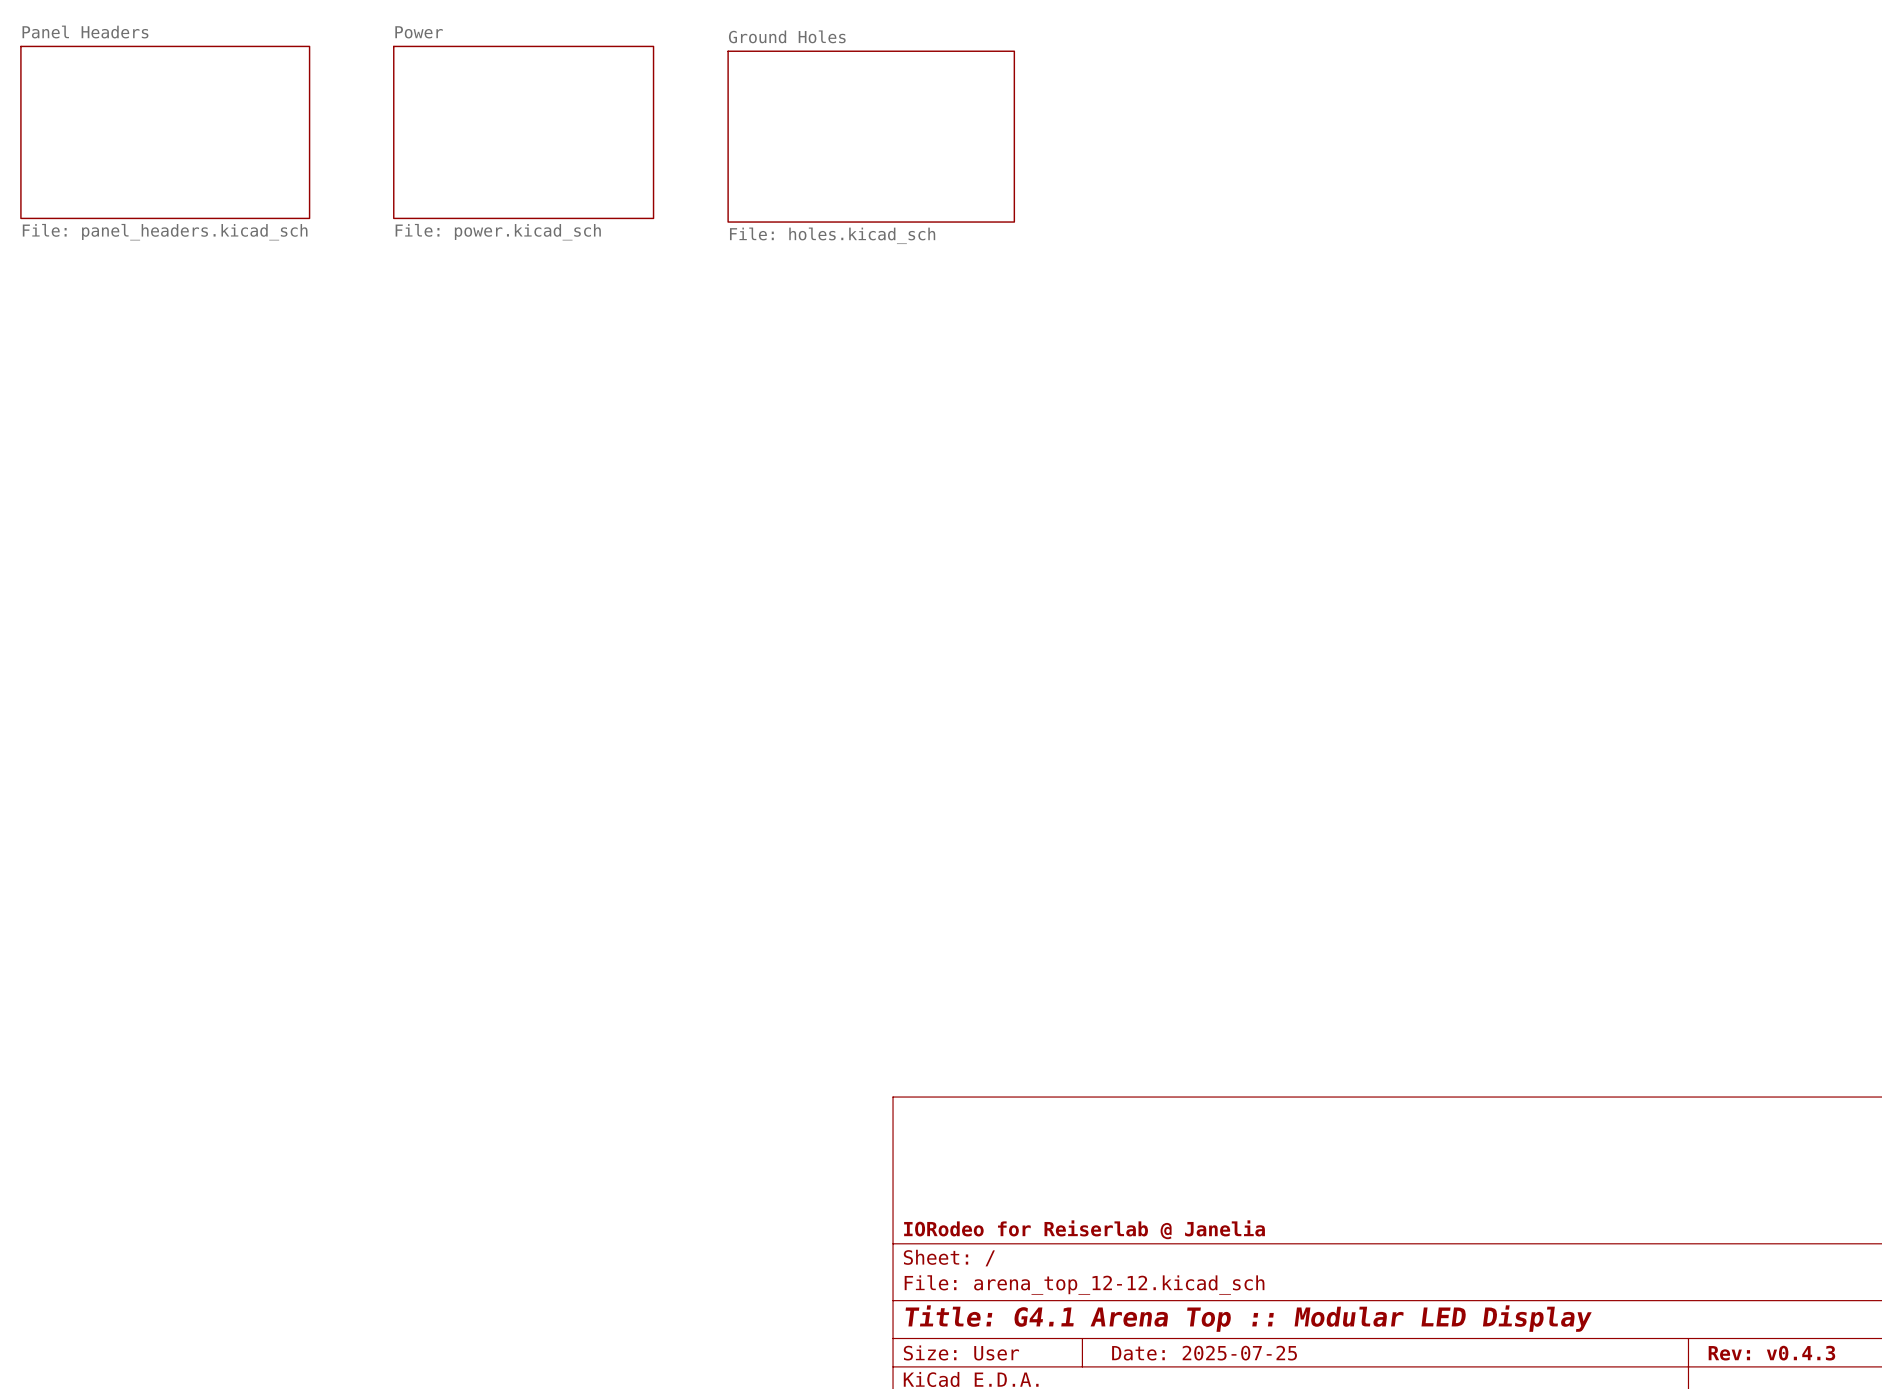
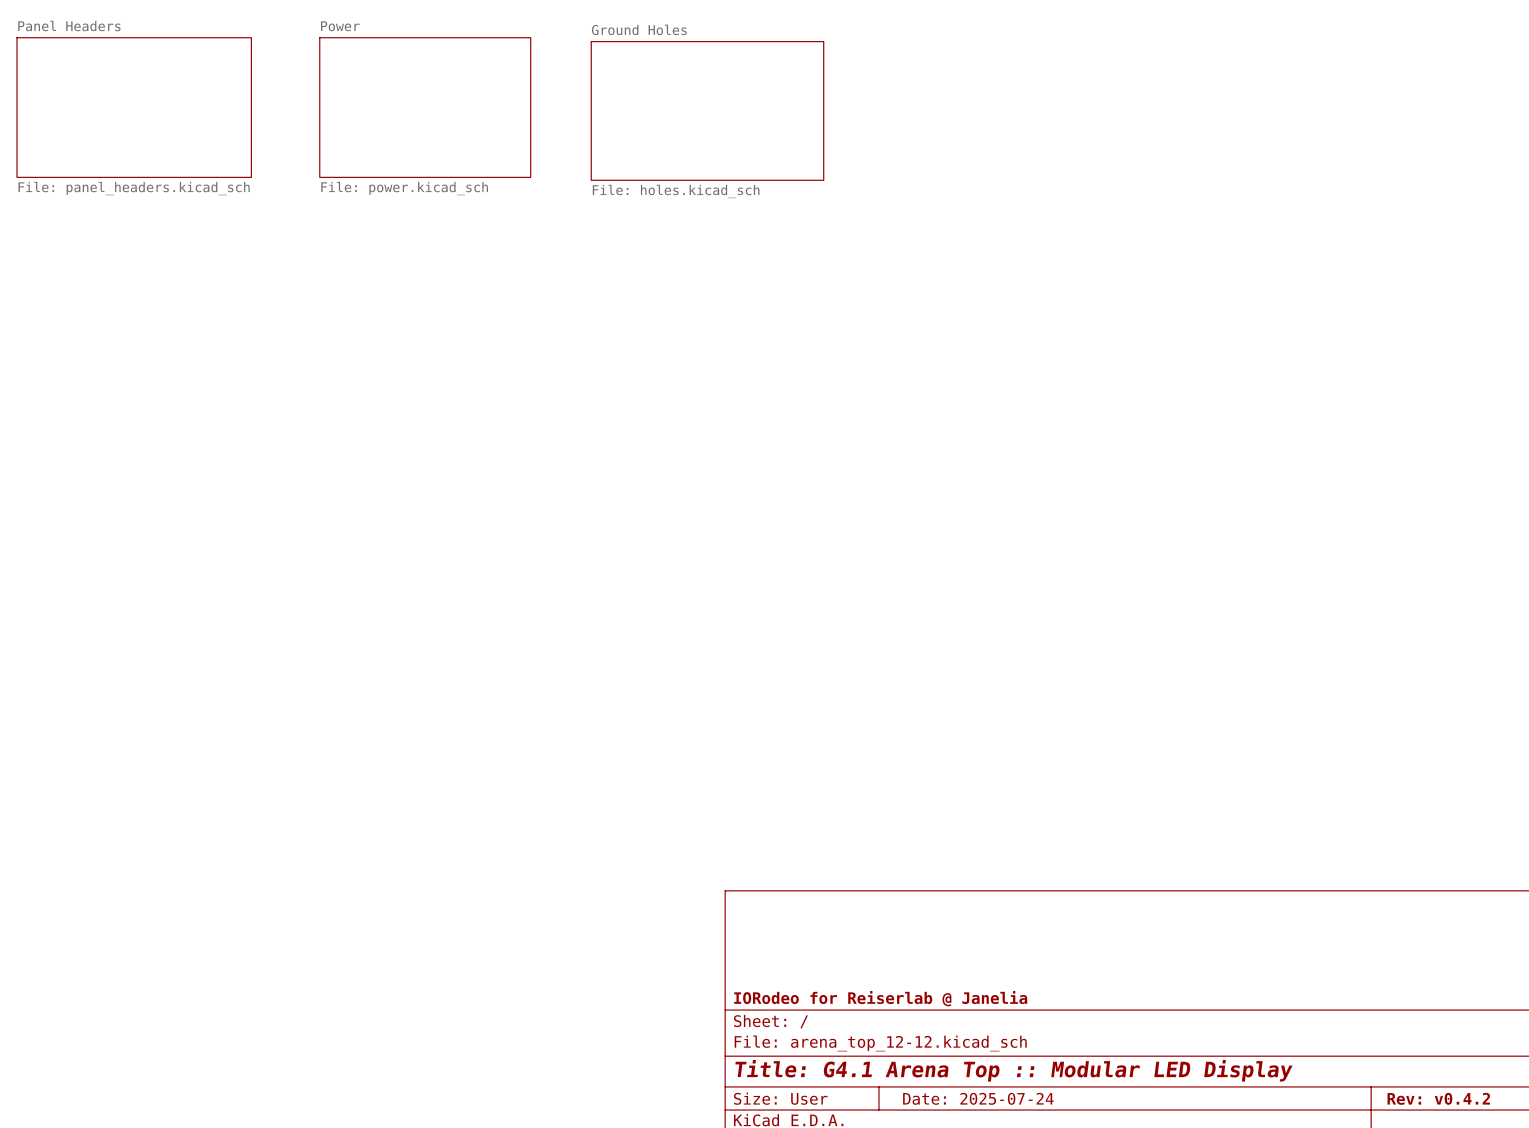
title block: Date: 2025-07-25 (1204, 1353) -> Date: 2025-07-24 (978, 1098)
title block: Rev: v0.4.3 (1771, 1353) -> Rev: v0.4.2 (1438, 1098)

